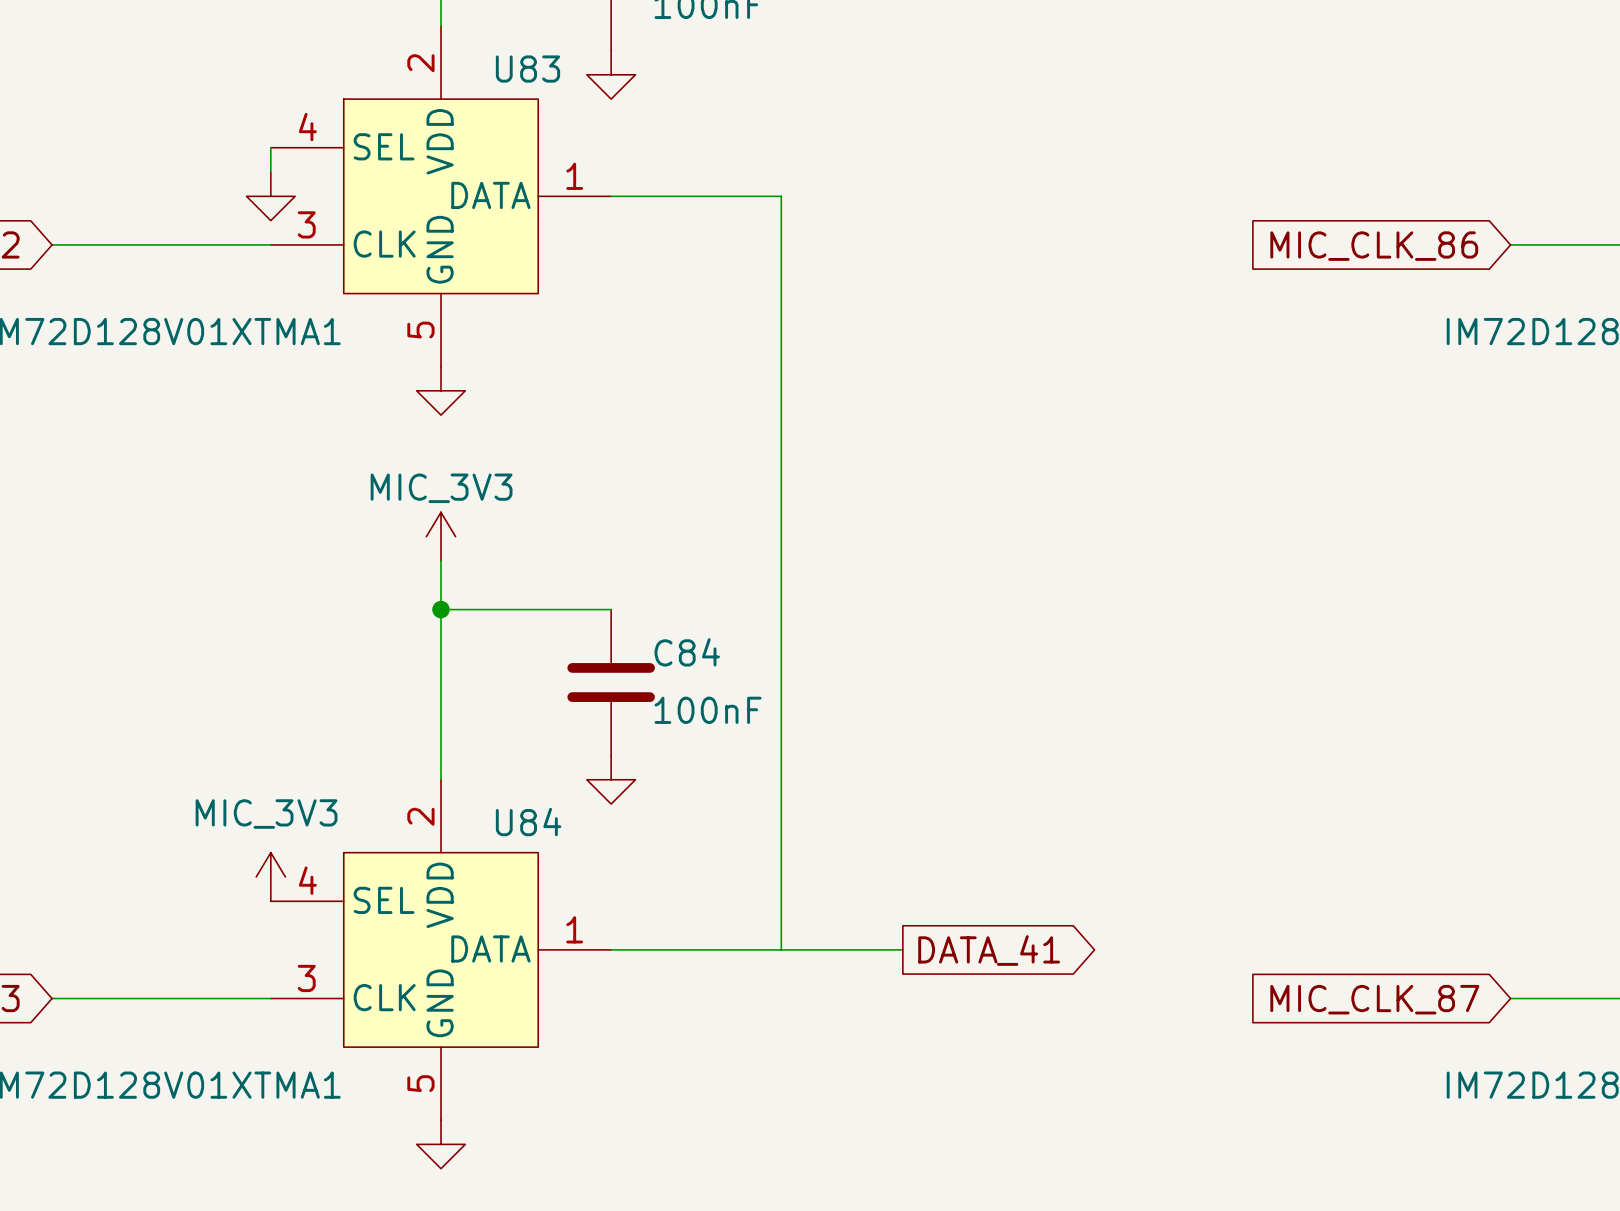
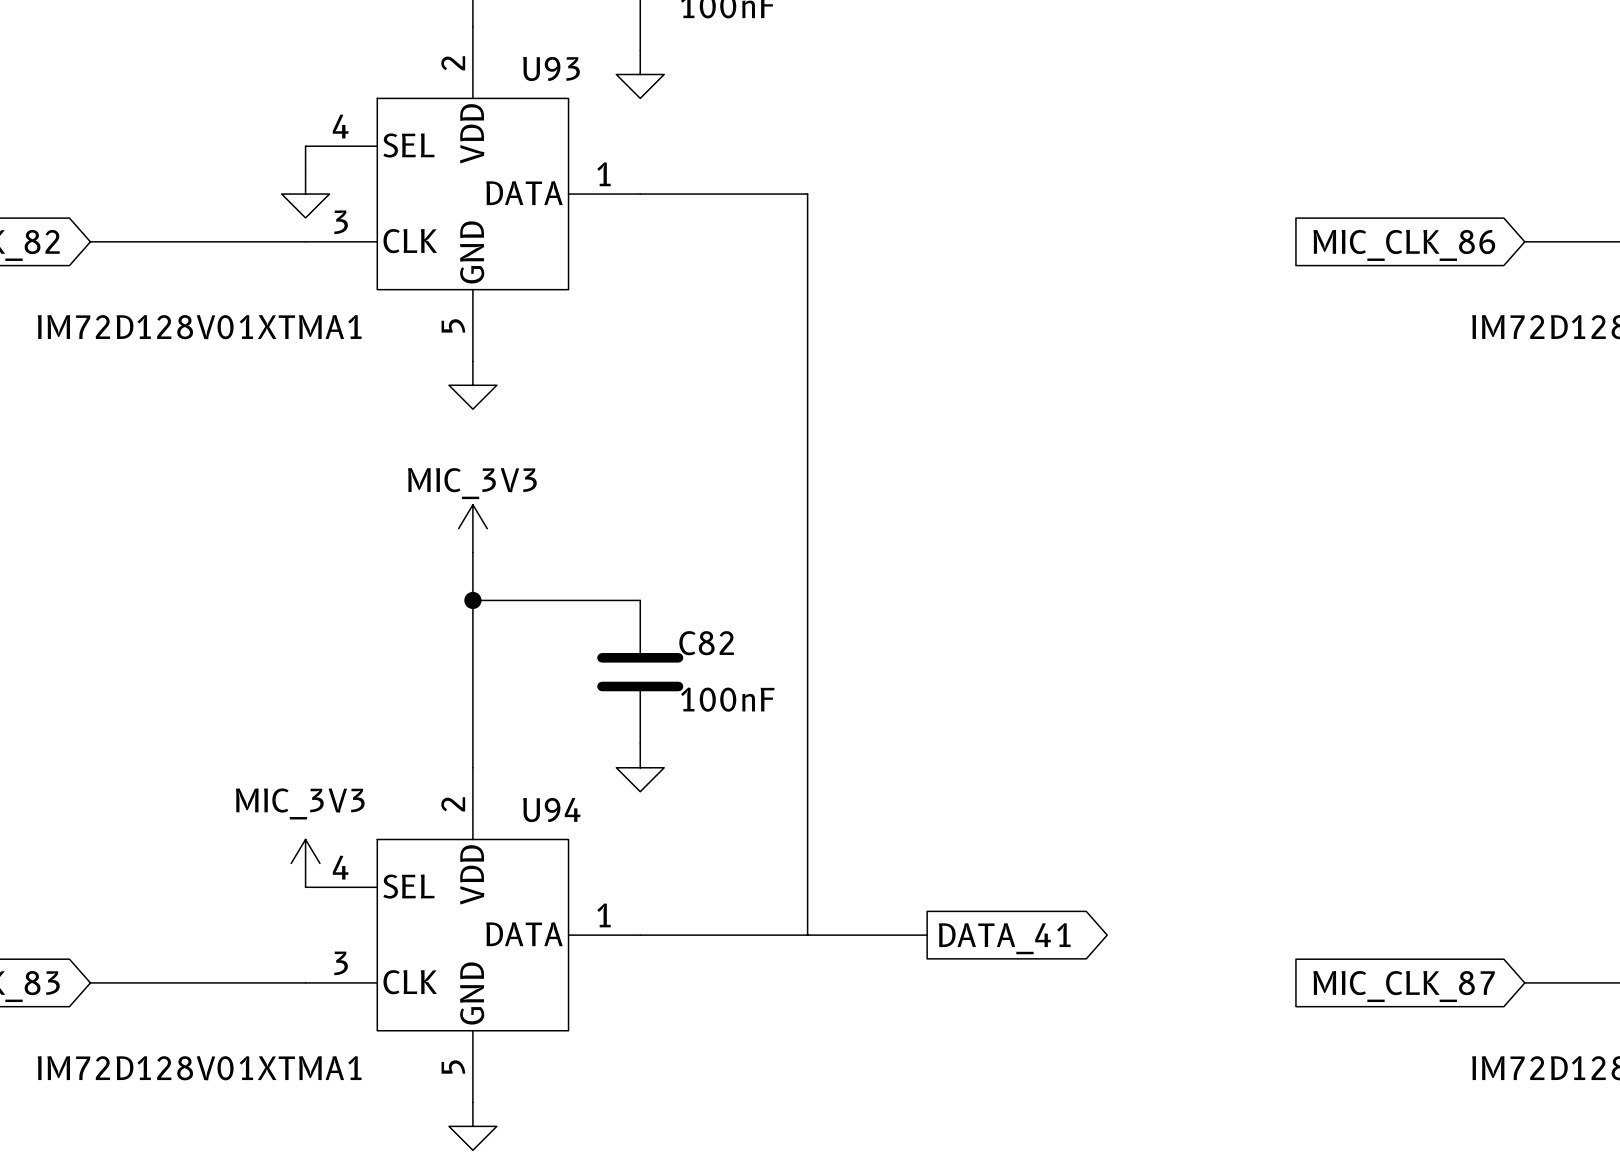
U83 name: U83 (527, 69) -> U93 (551, 68)
C84 name: C84 (687, 652) -> C82 (706, 643)
U84 name: U84 (528, 822) -> U94 (551, 810)

